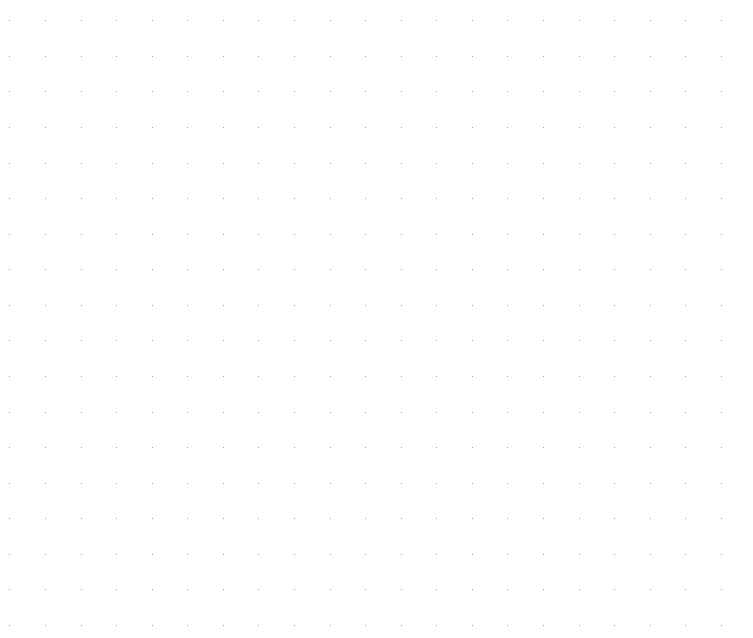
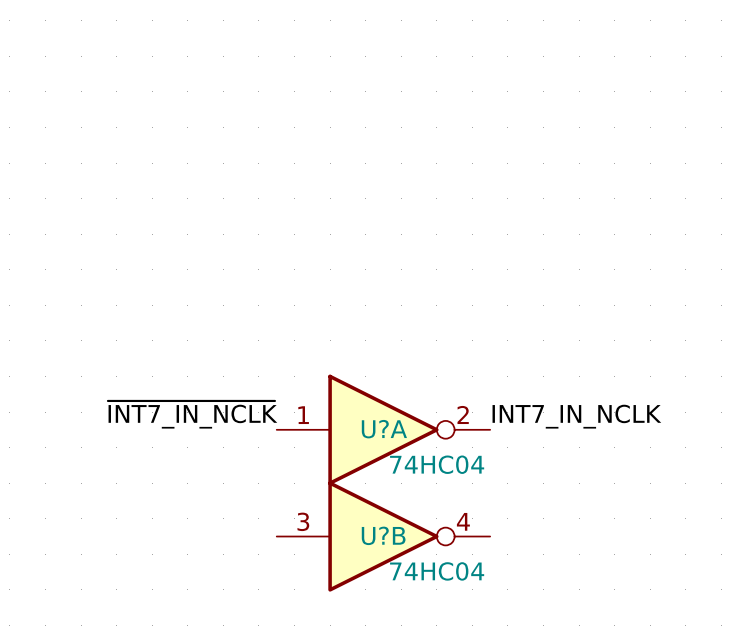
label: none -> ~{INT7_IN_NCLK} (192, 414)
label: none -> INT7_IN_NCLK (576, 416)
U?A: none -> 74HC04 (383, 429)
U?B: none -> 74HC04 (383, 536)

